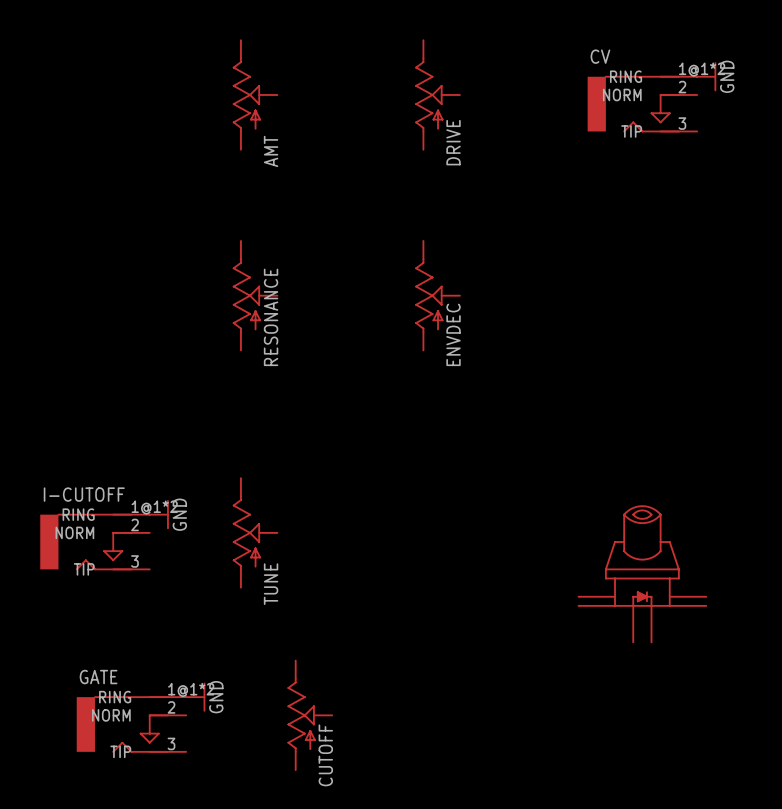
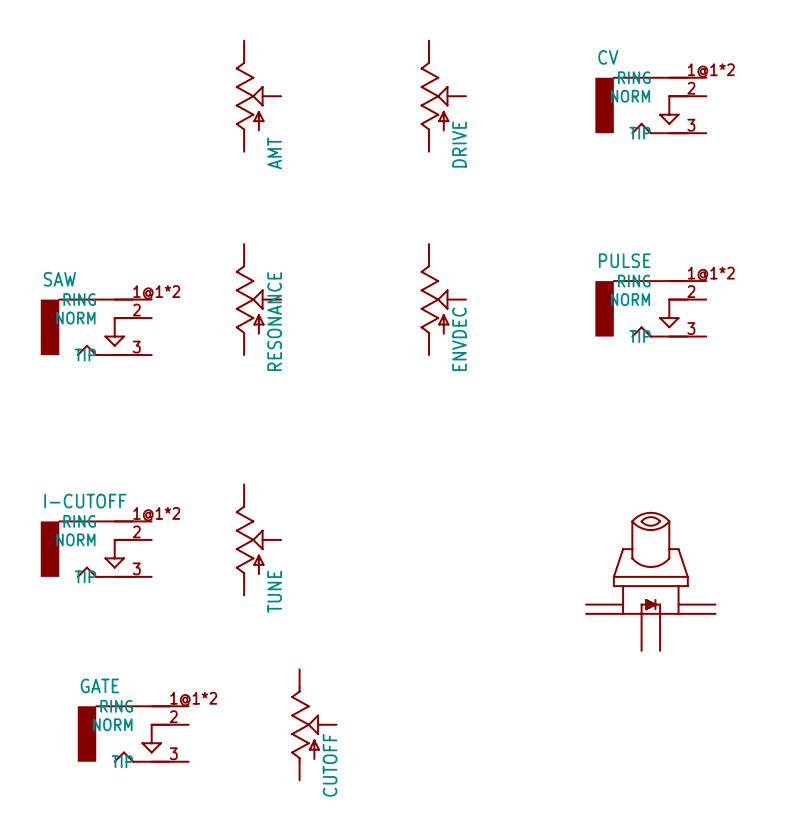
power symbol: GND (706, 76) -> none
PULSE: none -> (650, 308)
SAW: none -> (96, 327)
power symbol: GND (159, 514) -> none
power symbol: GND (195, 697) -> none

